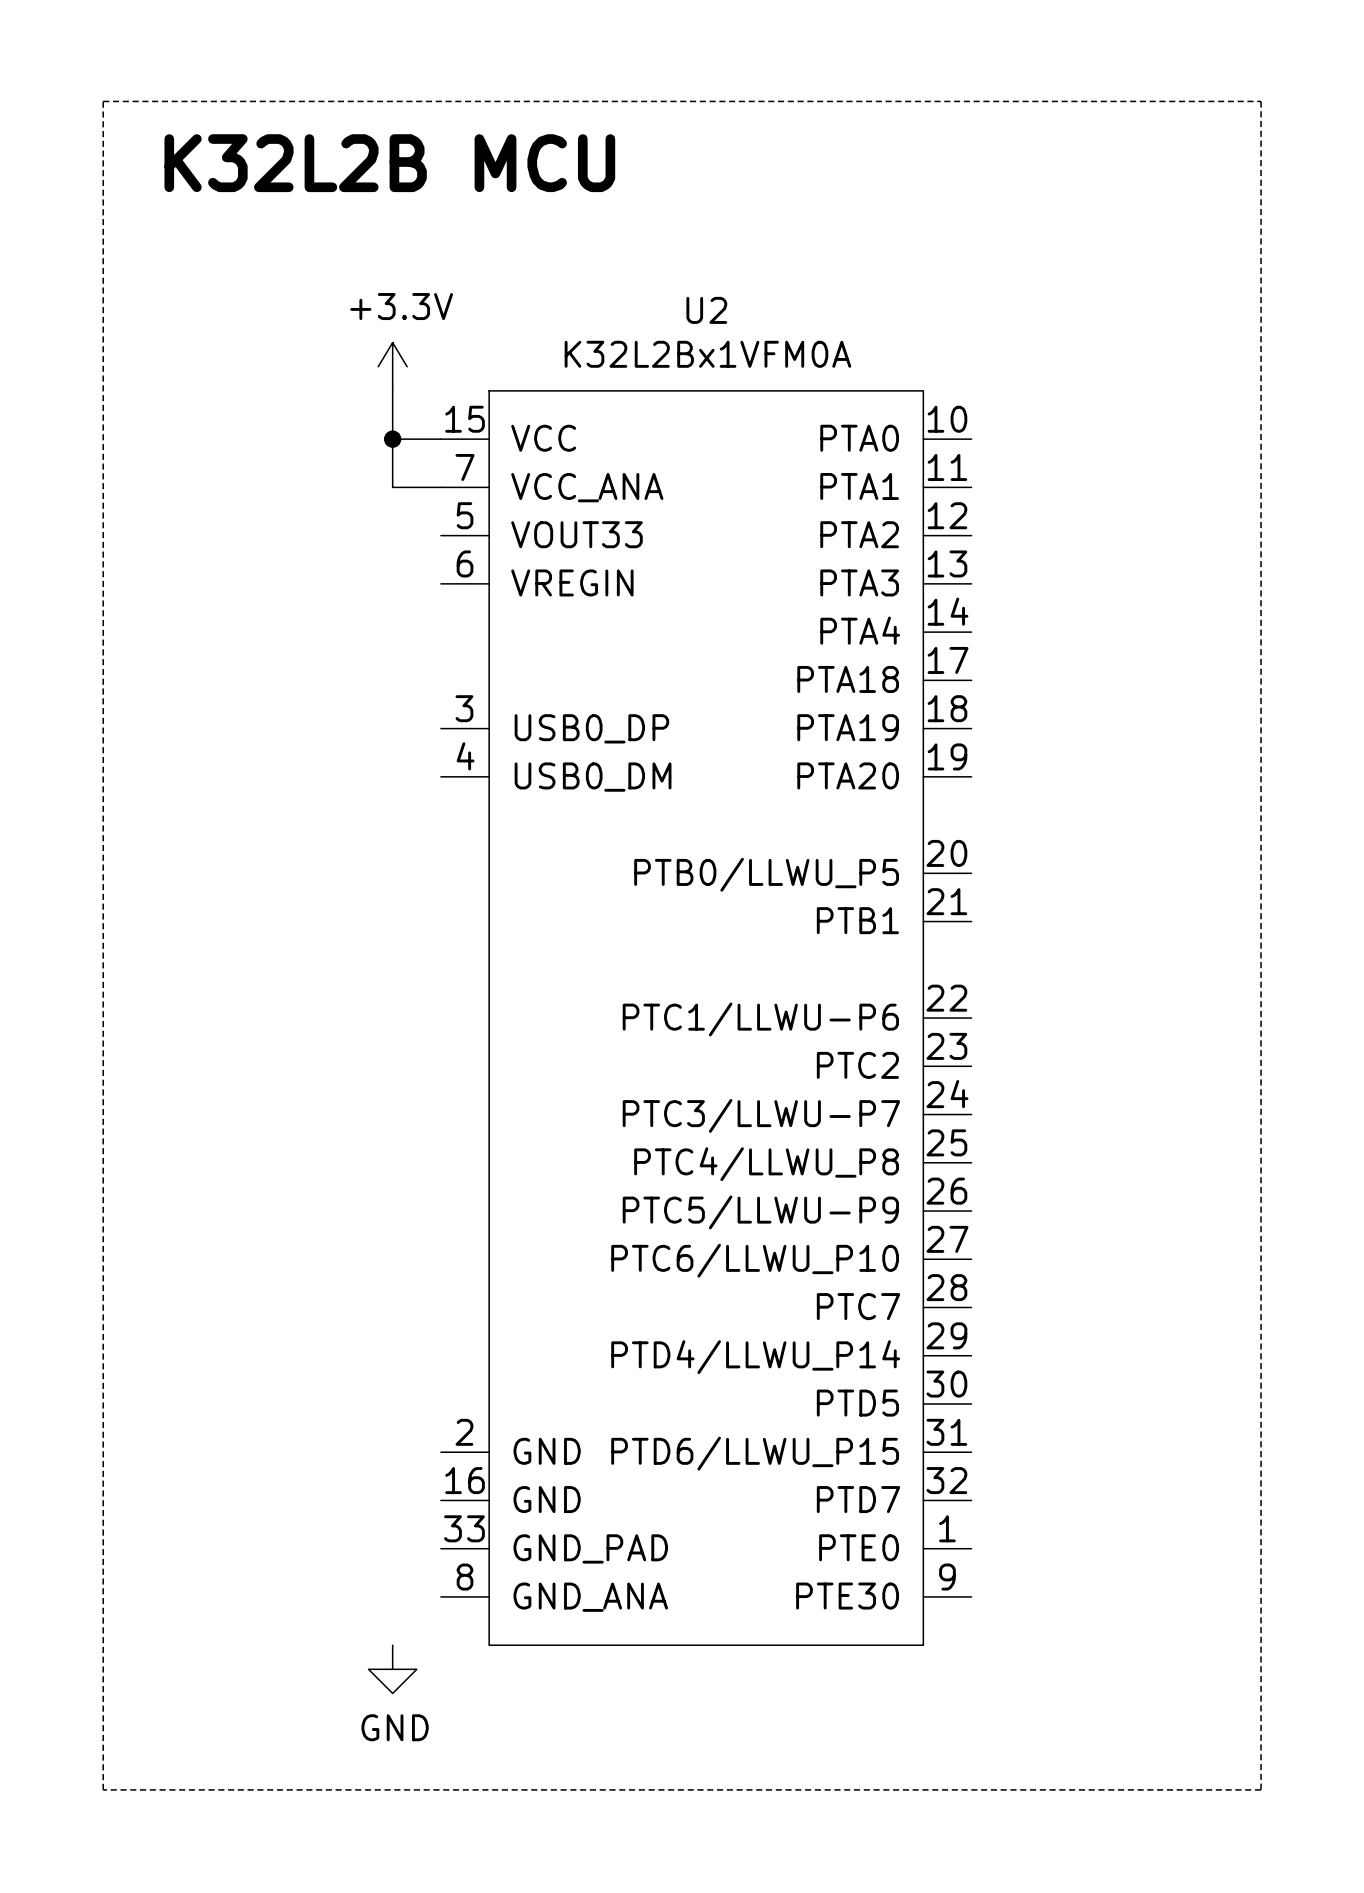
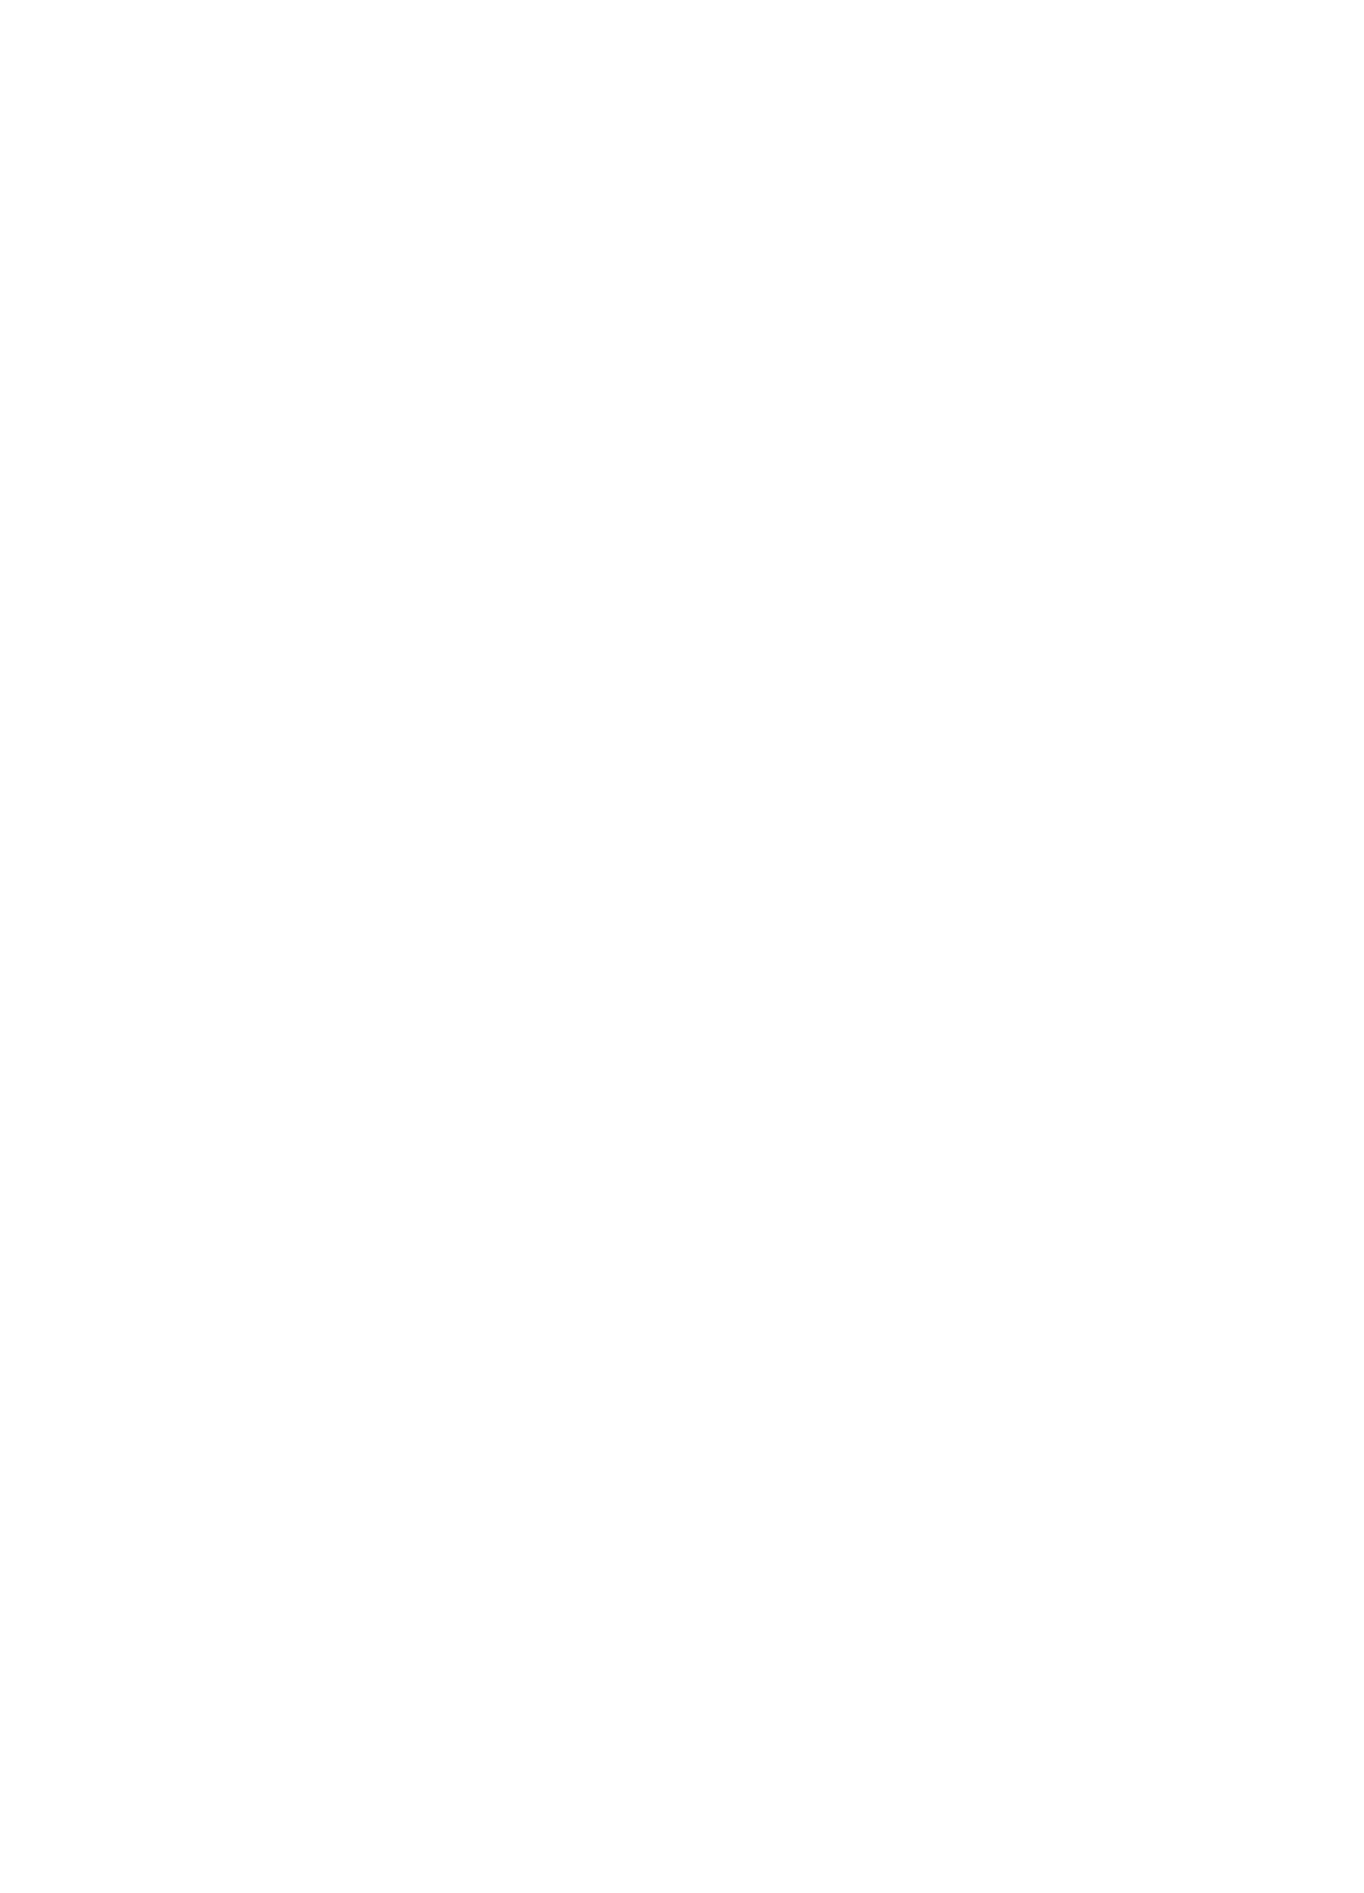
line: (103, 101) (1261, 101) (1261, 1789) (103, 1789) (103, 101) -> none
text: K32L2B MCU (389, 163) -> none
power symbol: +3.3V (392, 366) -> none
wire: (392, 390) (392, 487) (440, 487) -> none
wire: (392, 439) (440, 439) -> none
junction: (392, 439) -> none
U2: K32L2Bx1VFM0A (706, 1018) -> none
power symbol: GND (392, 1669) -> none

